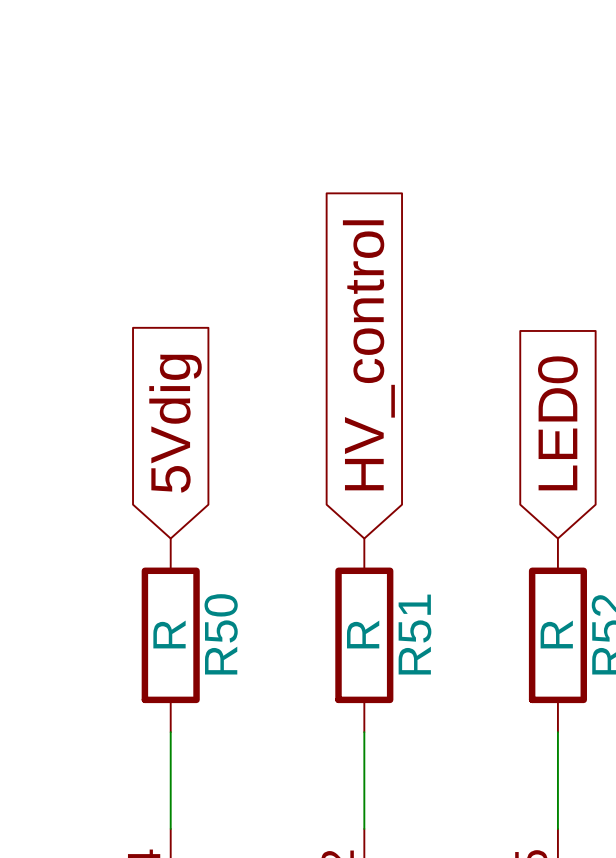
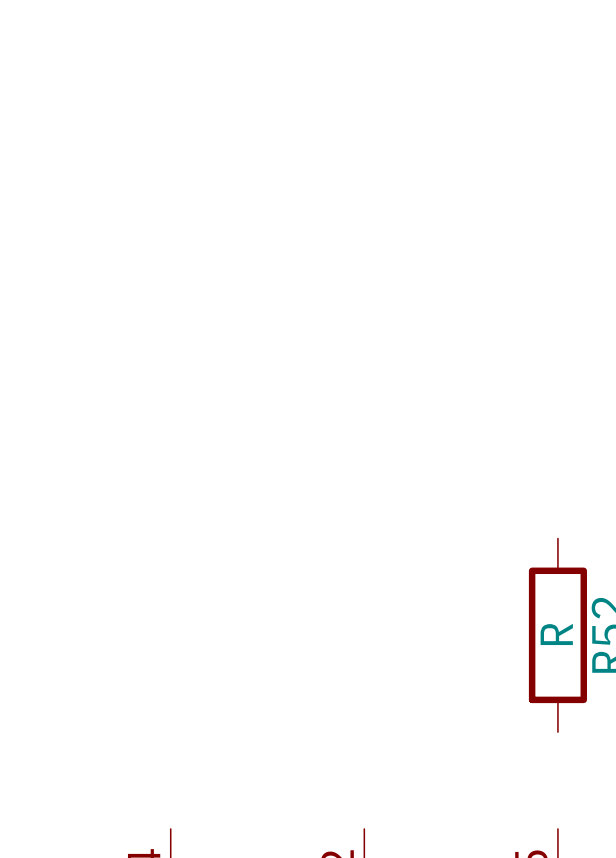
global label: HV_control (368, 355) -> none
global label: 5Vdig (175, 423) -> none
global label: LED0 (557, 423) -> none
R50: R (170, 635) -> none
R51: R (364, 635) -> none
wire: (170, 732) (170, 828) -> none
wire: (364, 732) (364, 828) -> none
wire: (557, 732) (557, 828) -> none

